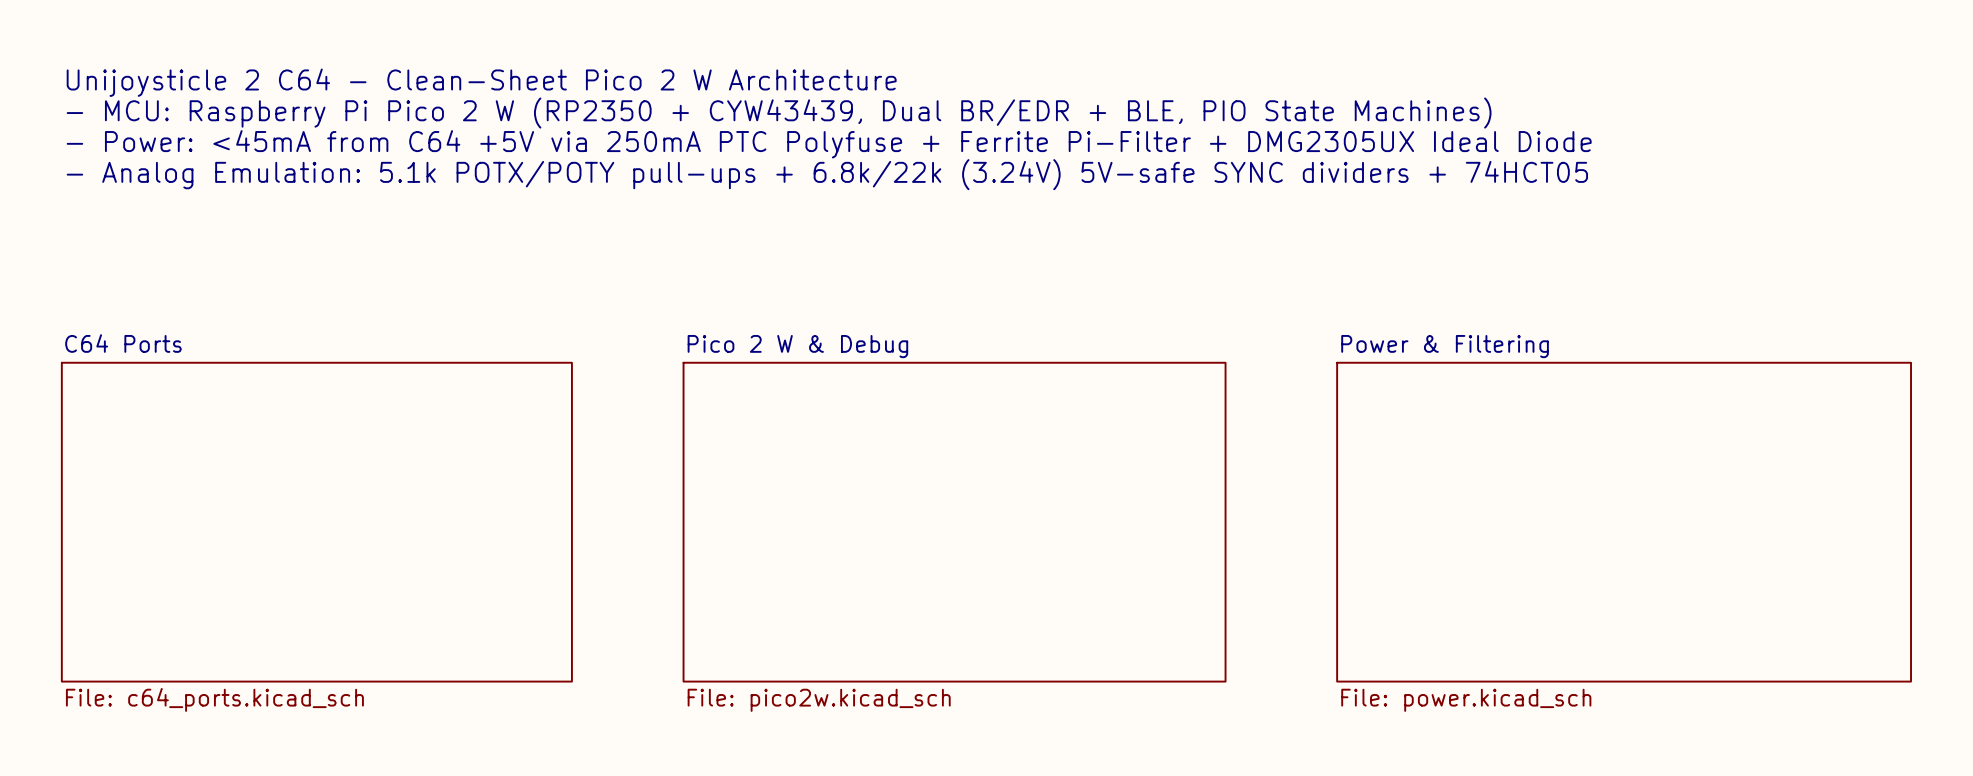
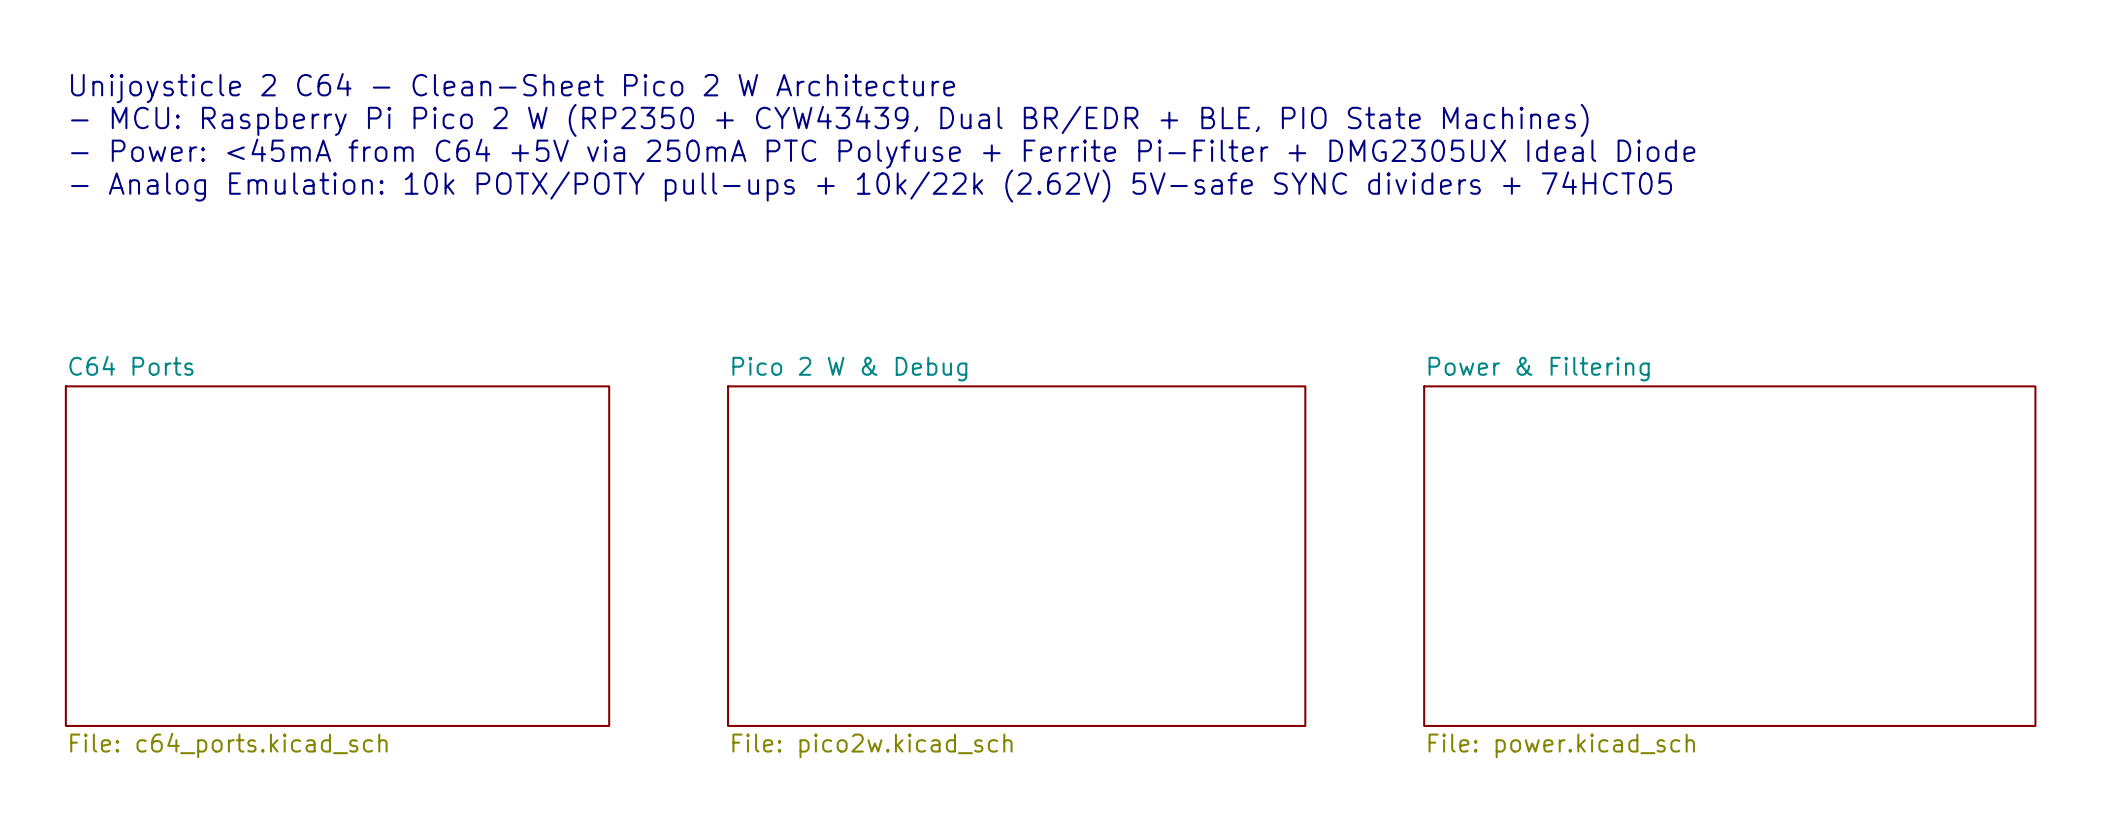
text: - Analog Emulation: 5.1k POTX/POTY pull-ups + 6.8k/22k (3.24V) 5V-safe SYNC dividers + 74HCT05 (827, 174) -> - Analog Emulation: 10k POTX/POTY pull-ups + 10k/22k (2.62V) 5V-safe SYNC dividers + 74HCT05 (871, 186)

